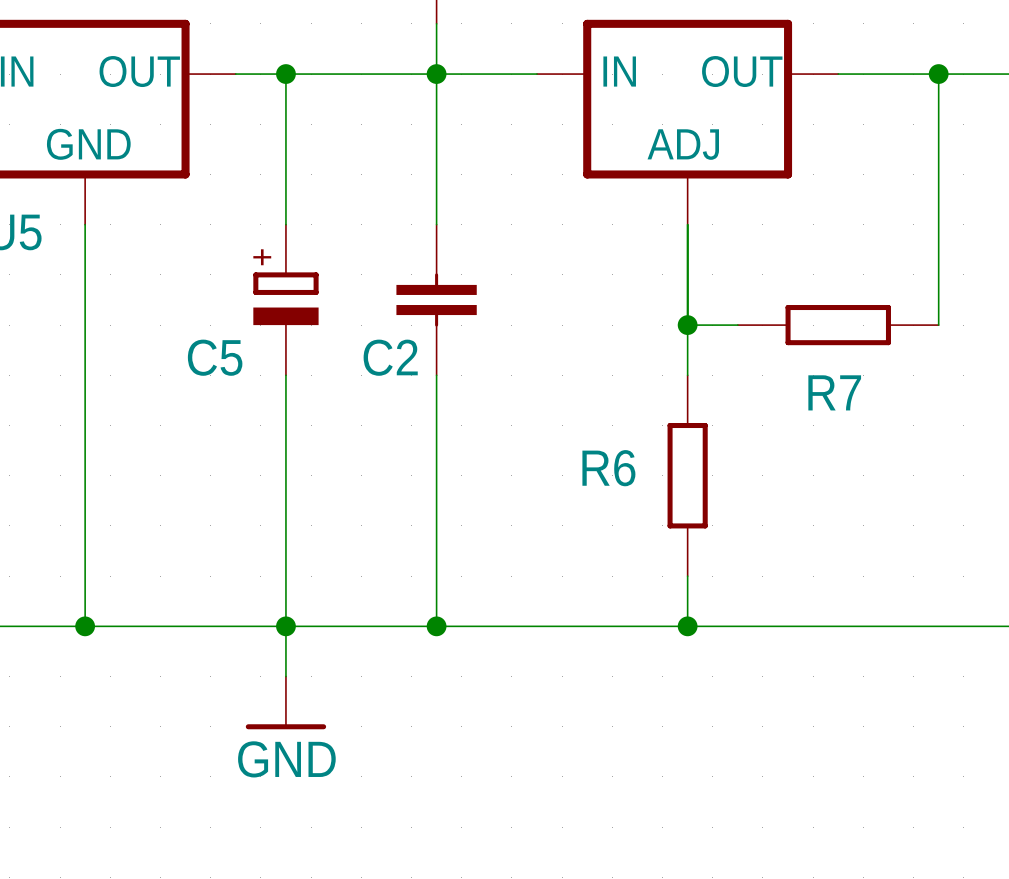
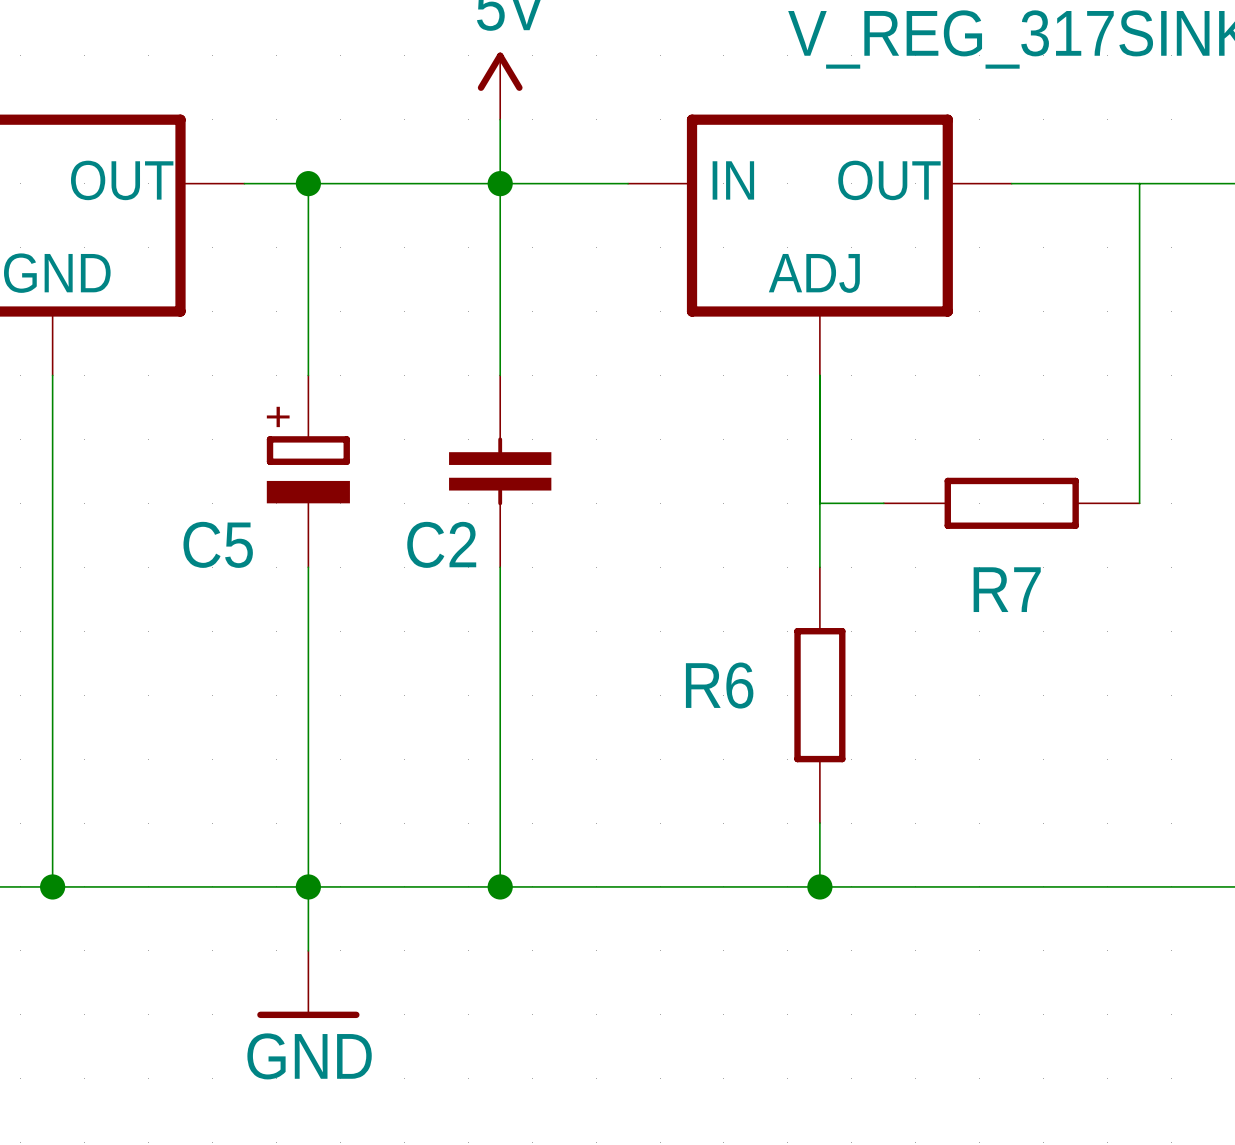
junction: (938, 74) -> none
junction: (687, 325) -> none

